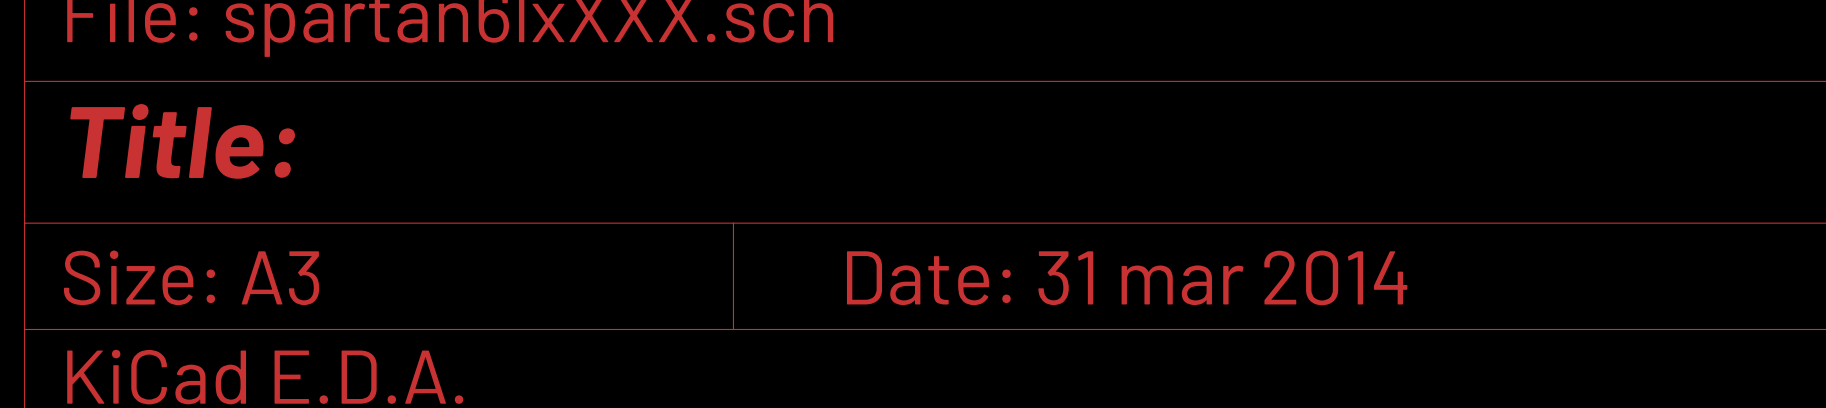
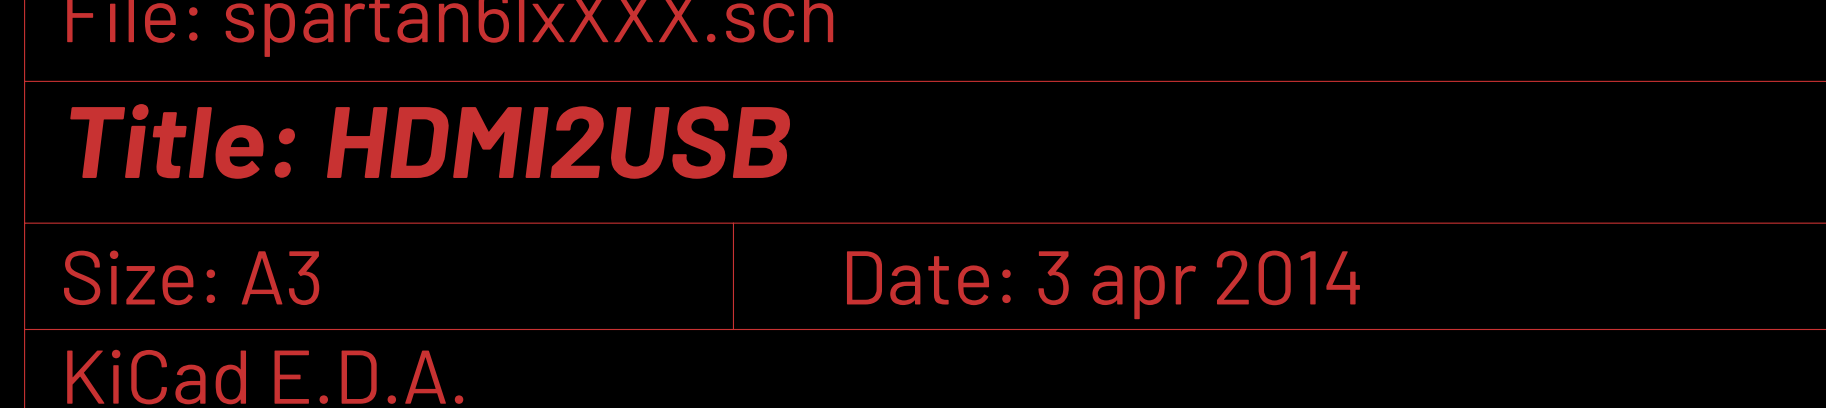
title block: Title: (182, 141) -> Title: HDMI2USB (431, 141)
title block: Date: 31 mar 2014 (1127, 277) -> Date: 3 apr 2014 (1103, 284)

